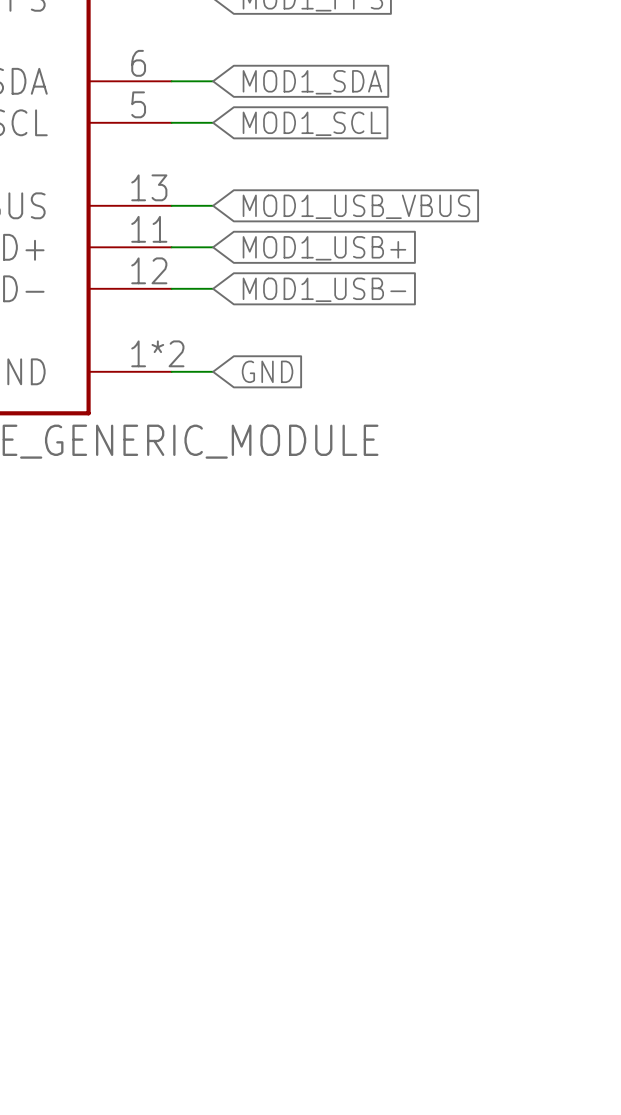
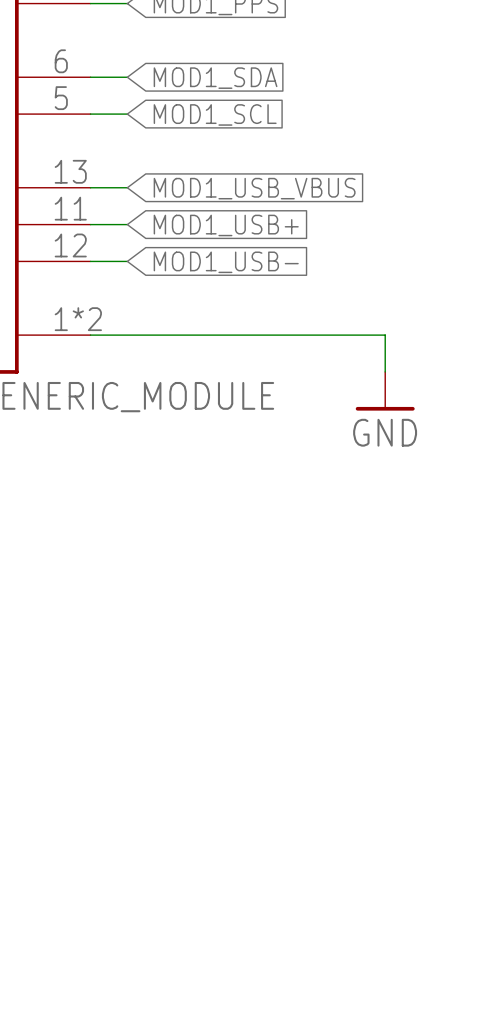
wire: none -> (127, 335) (385, 335) (385, 371)
global label: GND (267, 371) -> none
power symbol: none -> GND (385, 391)

